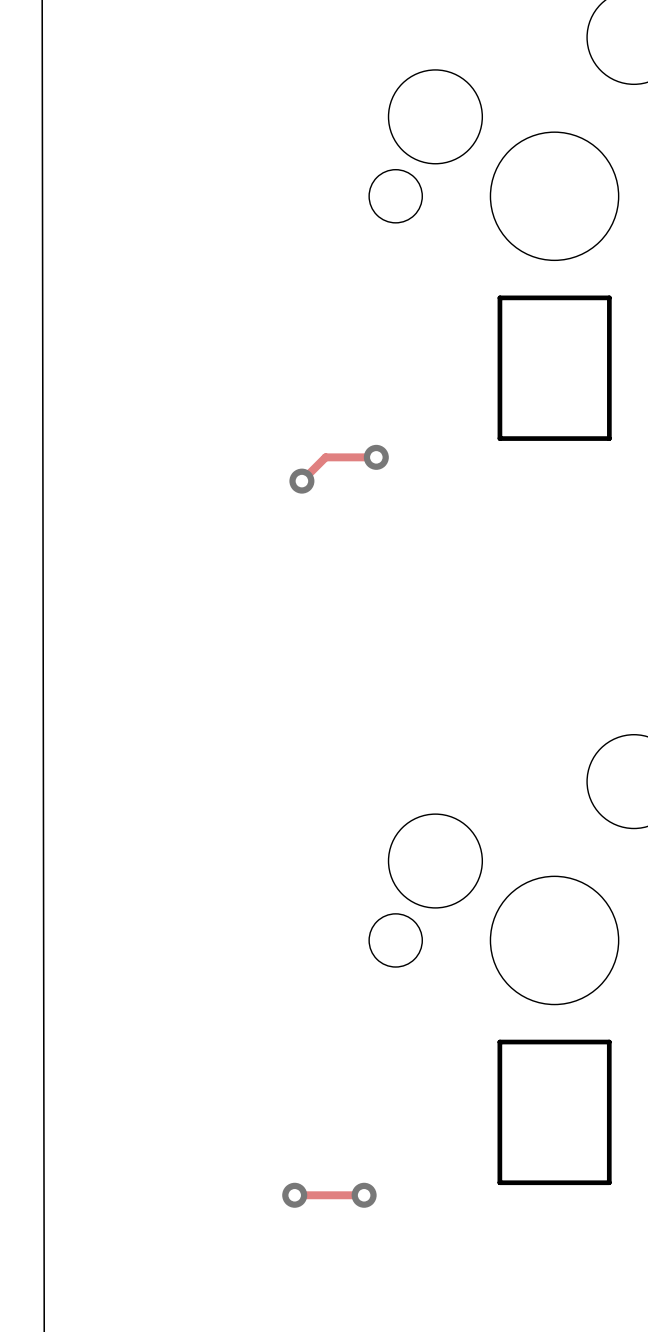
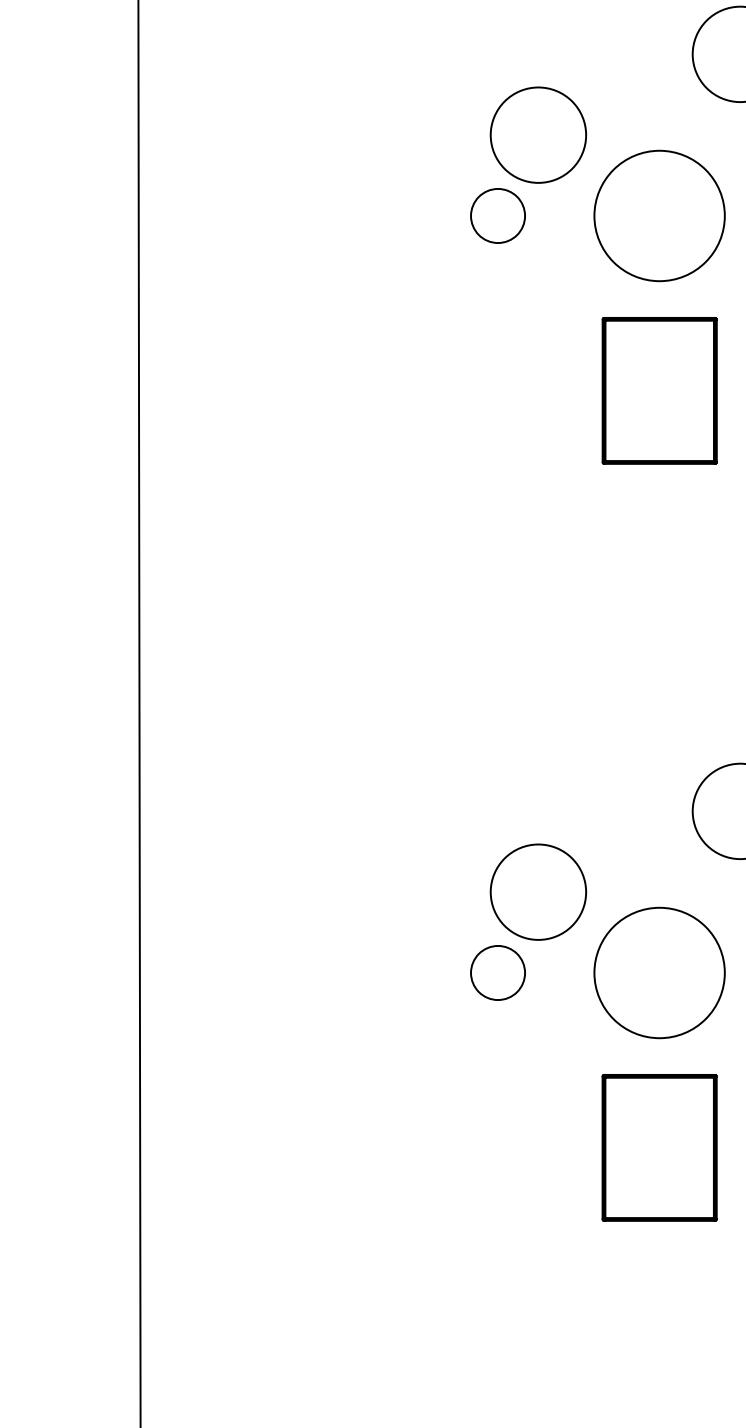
track: (376, 457) (325, 457) (301, 481) -> none
via: (376, 457) -> none
via: (301, 481) -> none
track: (294, 1195) (364, 1195) -> none
via: (294, 1195) -> none
via: (364, 1195) -> none

